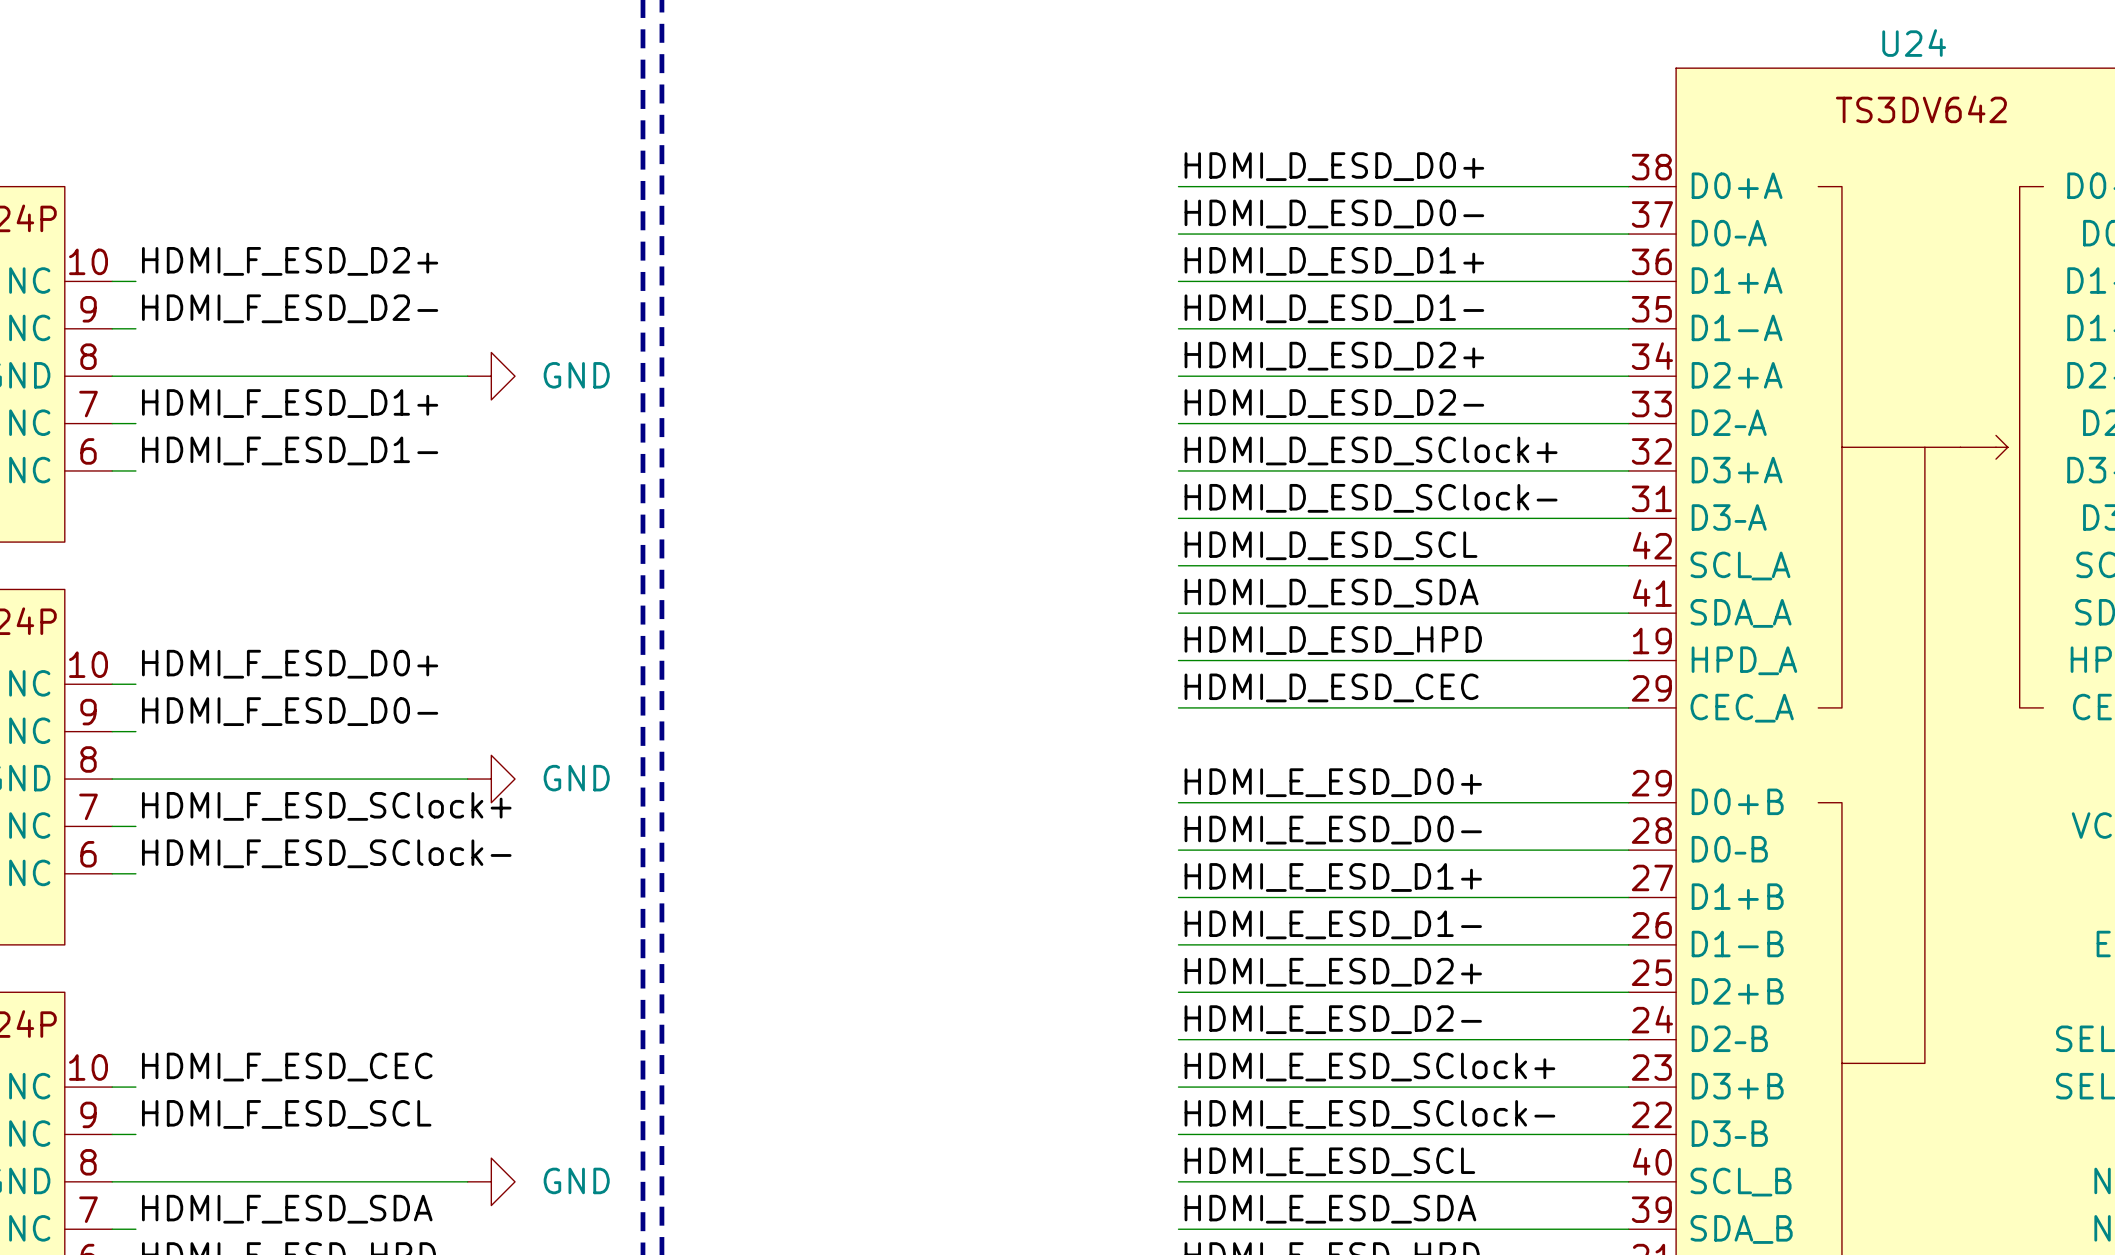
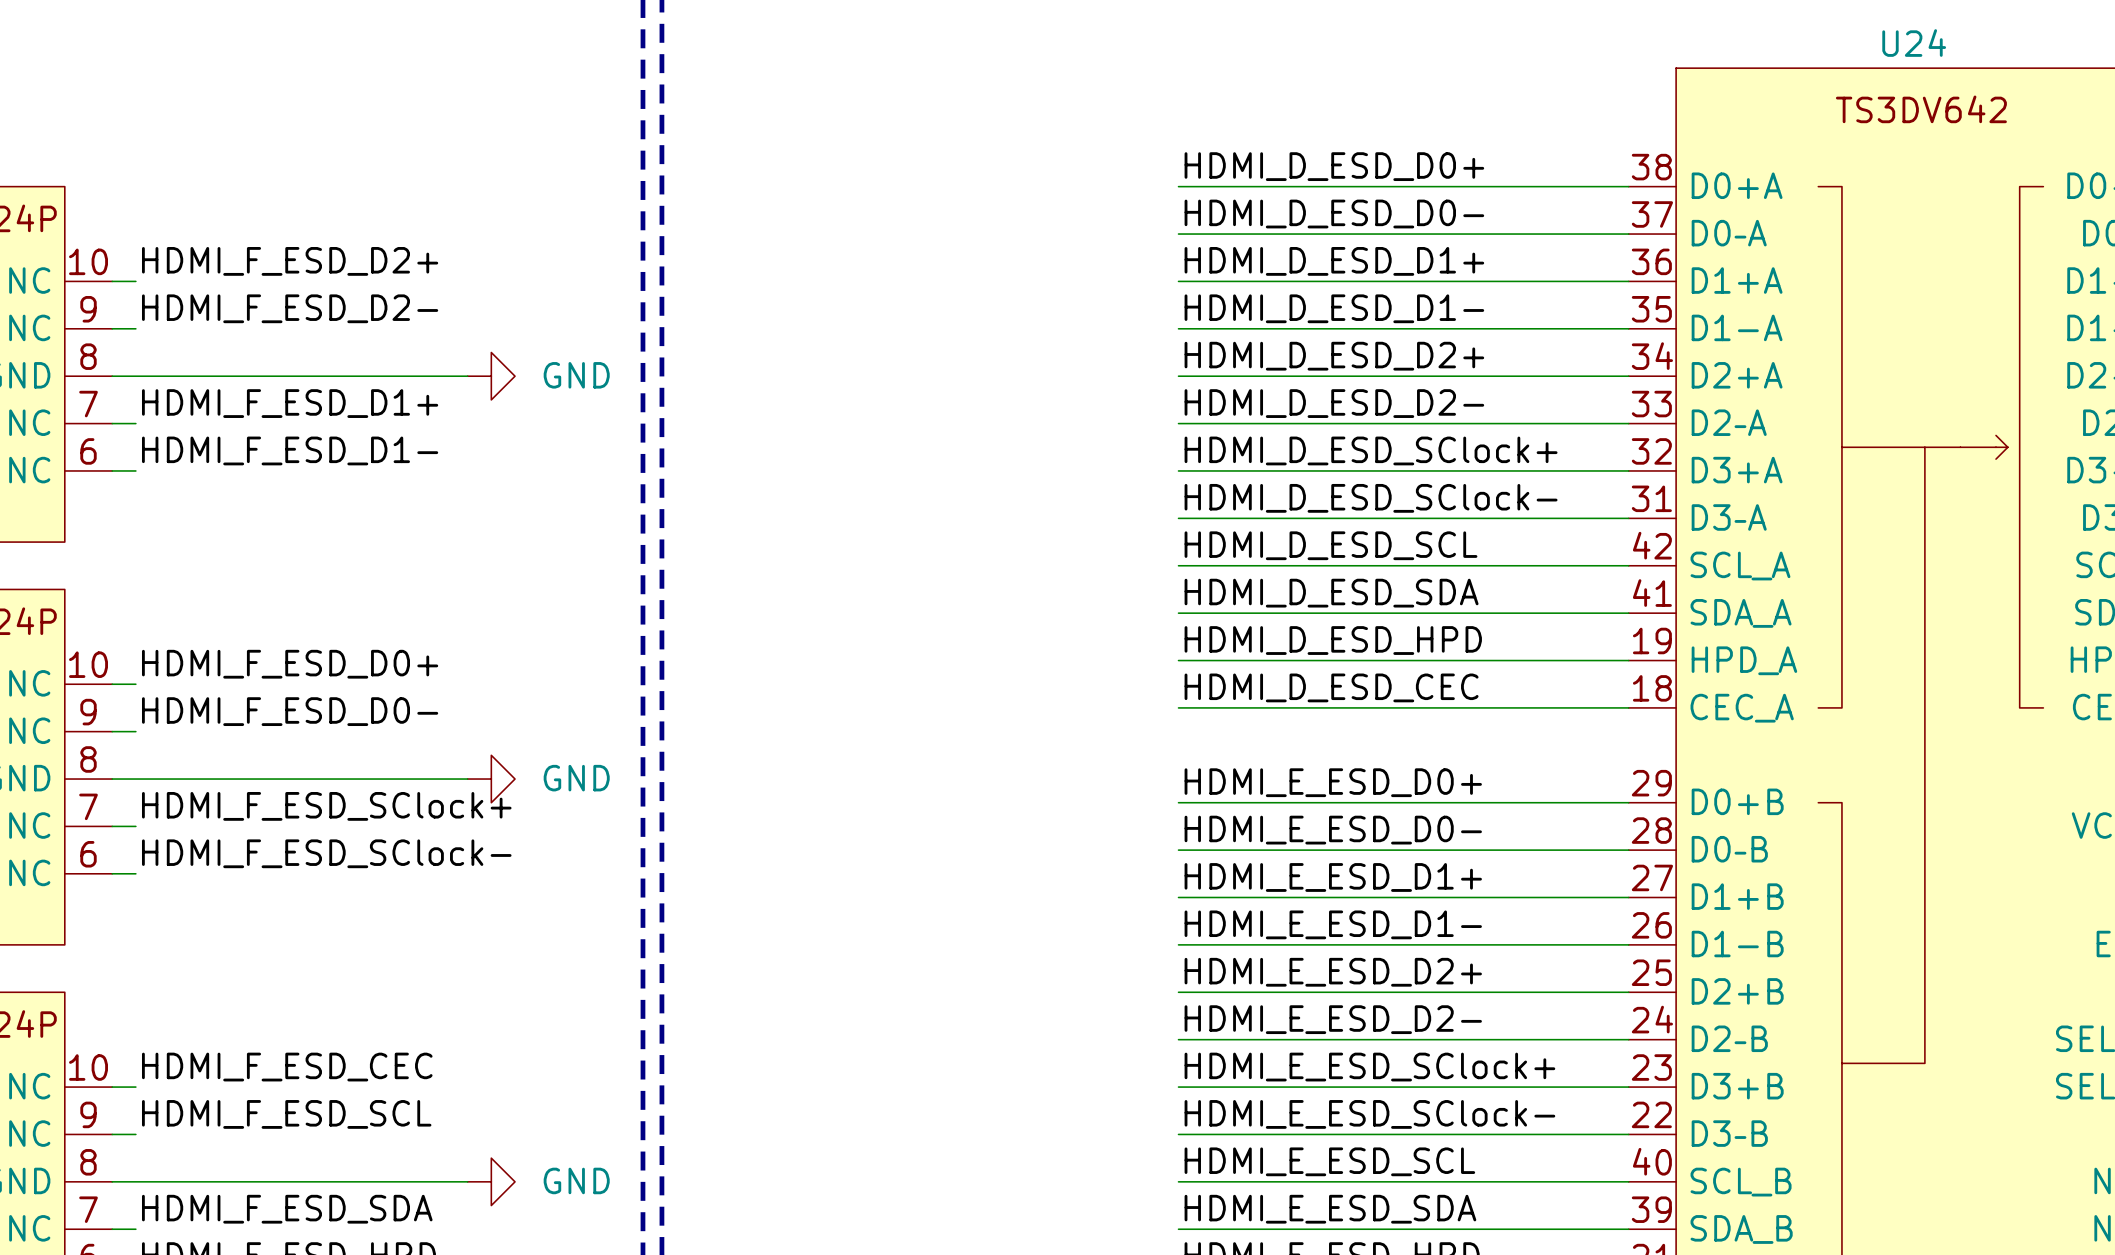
U24 pin number: 29 (1651, 688) -> 18 (1652, 688)

